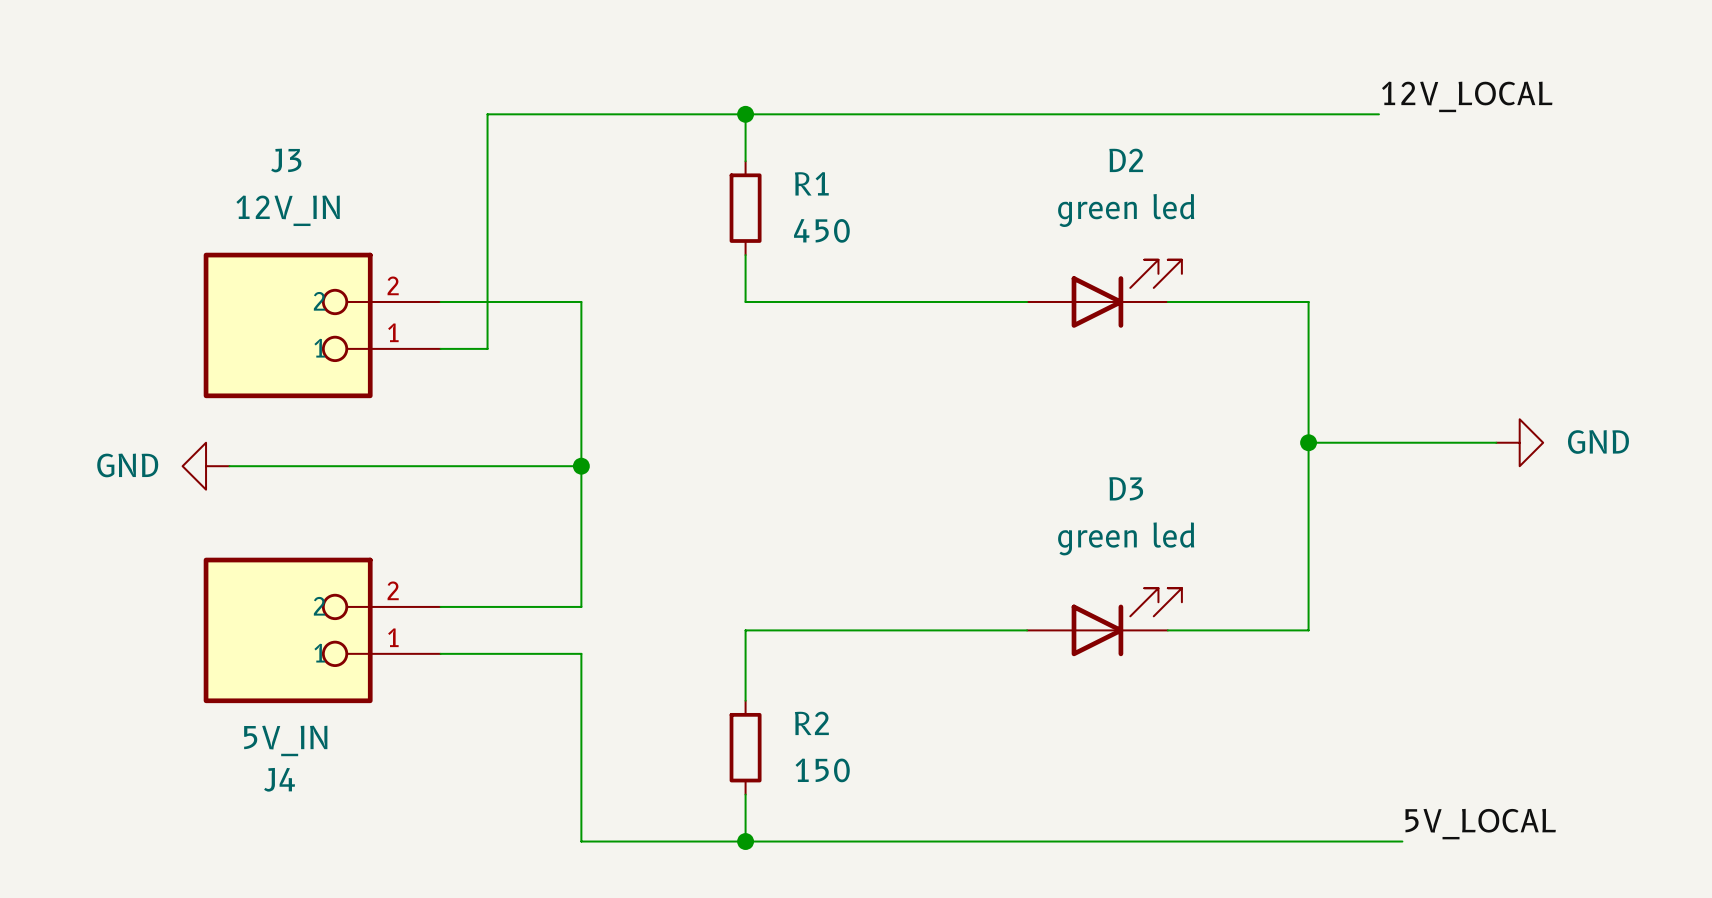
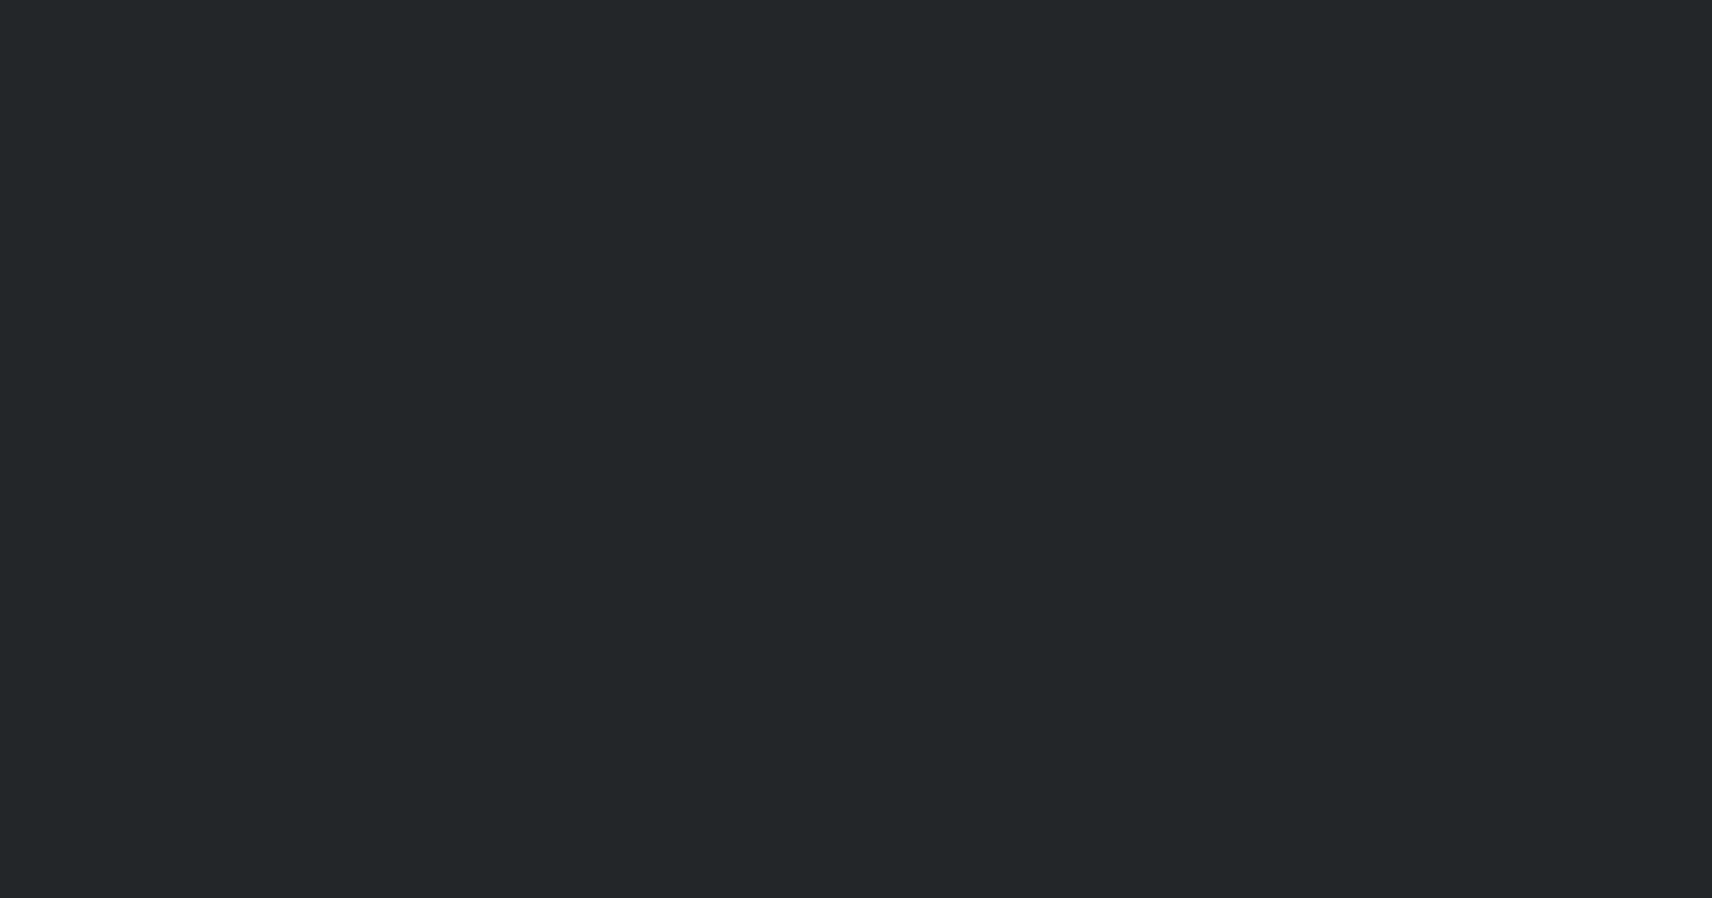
label: 12V_LOCAL (1467, 96) -> none
wire: (745, 114) (745, 161) -> none
junction: (745, 114) -> none
wire: (1378, 114) (487, 114) (487, 348) (440, 348) -> none
R1: 450 (745, 208) -> none
wire: (745, 255) (745, 301) (1027, 301) -> none
D2: green led (1104, 293) -> none
wire: (440, 301) (581, 301) (581, 606) (440, 606) -> none
wire: (1167, 301) (1308, 301) (1308, 630) (1167, 630) -> none
J3: 12V_IN (322, 325) -> none
wire: (1308, 442) (1496, 442) -> none
junction: (1308, 442) -> none
power symbol: GND (1519, 442) -> none
power symbol: GND (206, 466) -> none
wire: (229, 466) (581, 466) -> none
junction: (581, 466) -> none
D3: green led (1104, 622) -> none
J4: 5V_IN (322, 630) -> none
wire: (1027, 630) (745, 630) (745, 700) -> none
wire: (440, 653) (581, 653) (581, 841) (1402, 841) -> none
R2: 150 (745, 747) -> none
wire: (745, 794) (745, 841) -> none
label: 5V_LOCAL (1480, 824) -> none
junction: (745, 841) -> none

